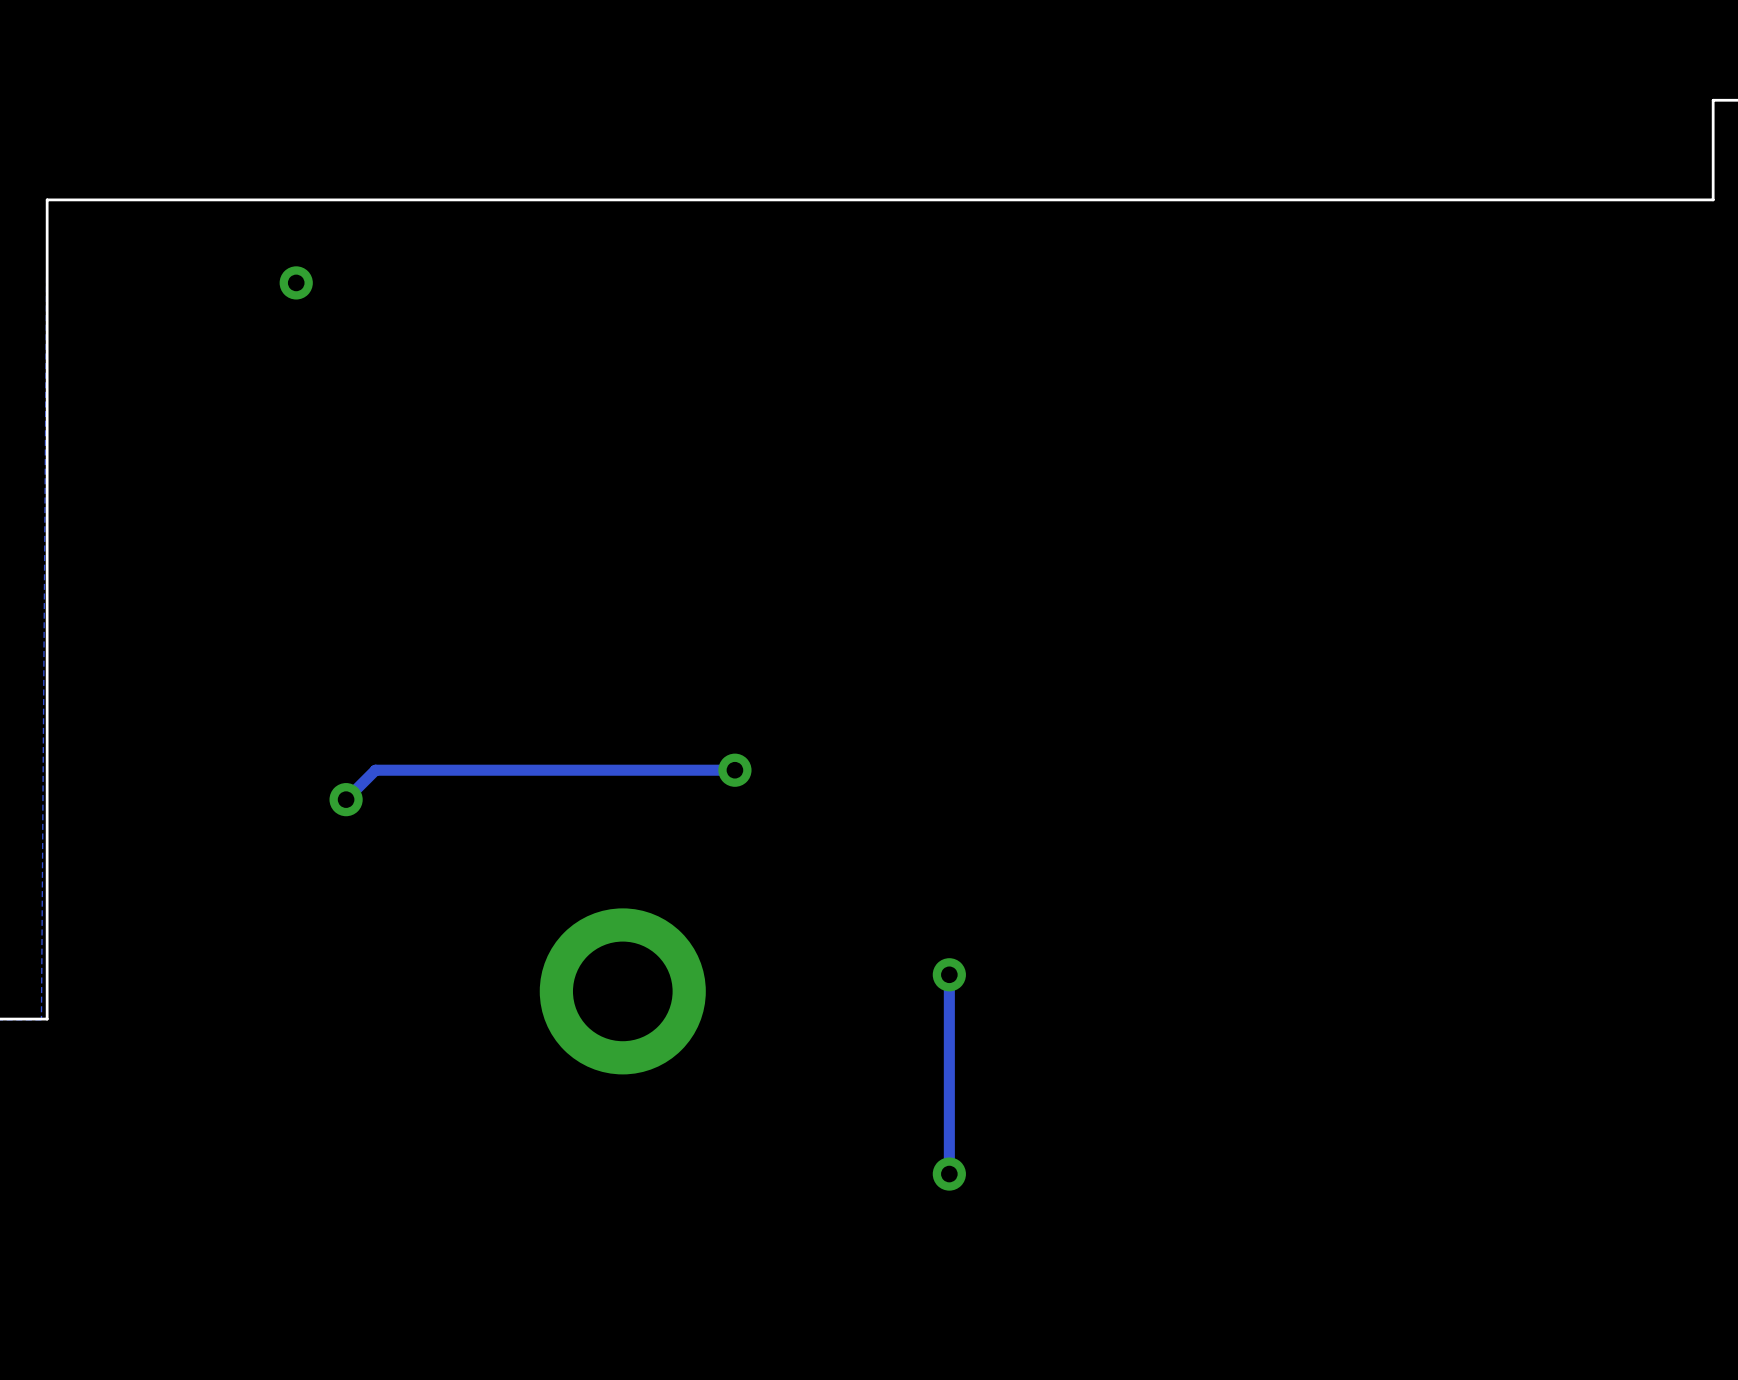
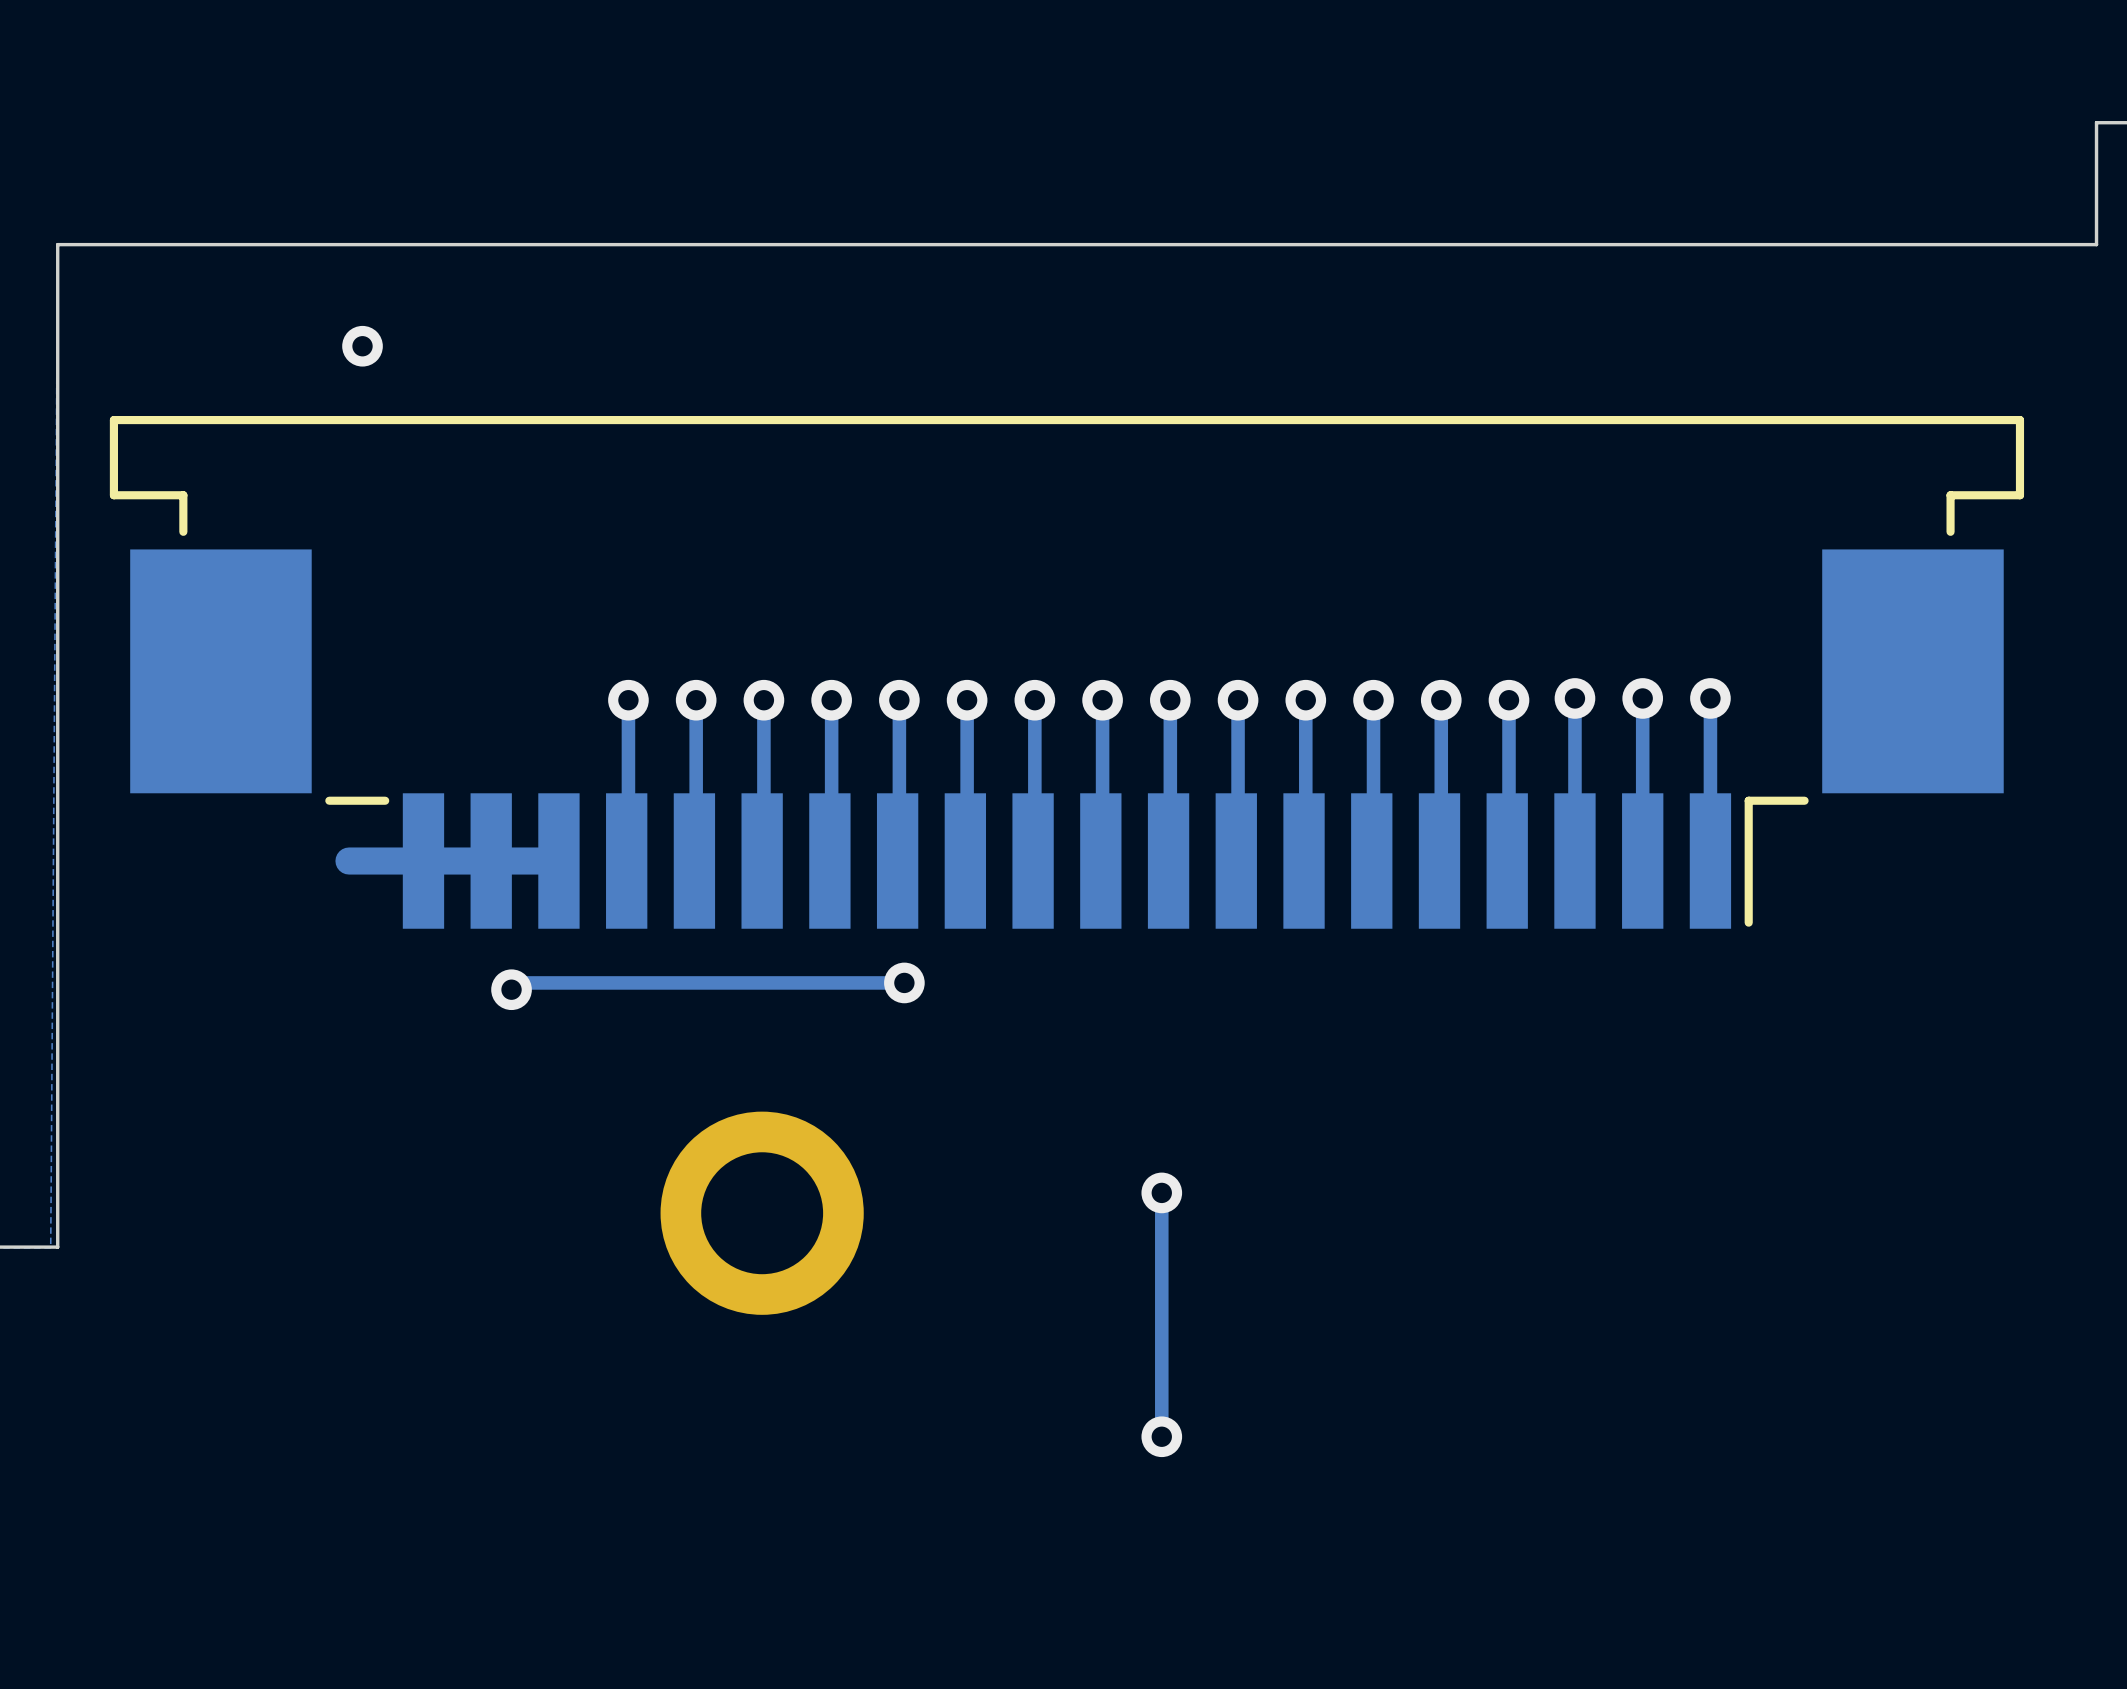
part: none -> (1066, 672)
track: none -> (1574, 698) (1574, 861)
via: none -> (1574, 698)
track: none -> (1642, 698) (1642, 861)
via: none -> (1642, 698)
track: none -> (1710, 698) (1710, 861)
via: none -> (1710, 698)
track: none -> (628, 700) (628, 859) (626, 861)
via: none -> (628, 700)
track: none -> (696, 700) (696, 859) (694, 861)
via: none -> (696, 700)
track: none -> (763, 700) (763, 859) (762, 861)
via: none -> (763, 700)
track: none -> (831, 700) (831, 859) (829, 861)
via: none -> (831, 700)
track: none -> (899, 700) (899, 859) (897, 861)
via: none -> (899, 700)
track: none -> (967, 700) (967, 859) (965, 861)
via: none -> (967, 700)
track: none -> (1034, 700) (1034, 859) (1033, 861)
via: none -> (1034, 700)
track: none -> (1102, 700) (1102, 859) (1100, 861)
via: none -> (1102, 700)
track: none -> (1170, 700) (1170, 859) (1168, 861)
via: none -> (1170, 700)
track: none -> (1238, 700) (1238, 859) (1236, 861)
via: none -> (1238, 700)
track: none -> (1305, 700) (1305, 859) (1304, 861)
via: none -> (1305, 700)
track: none -> (1373, 700) (1373, 859) (1371, 861)
via: none -> (1373, 700)
track: none -> (1441, 700) (1441, 859) (1439, 861)
via: none -> (1441, 700)
track: none -> (1508, 700) (1508, 859) (1507, 861)
via: none -> (1508, 700)
track: none -> (558, 861) (348, 861)
track: (734, 770) (375, 770) (346, 799) -> none
via position: (734, 770) -> (904, 982)
via position: (346, 799) -> (511, 989)
track: none -> (904, 982) (518, 982) (511, 989)

